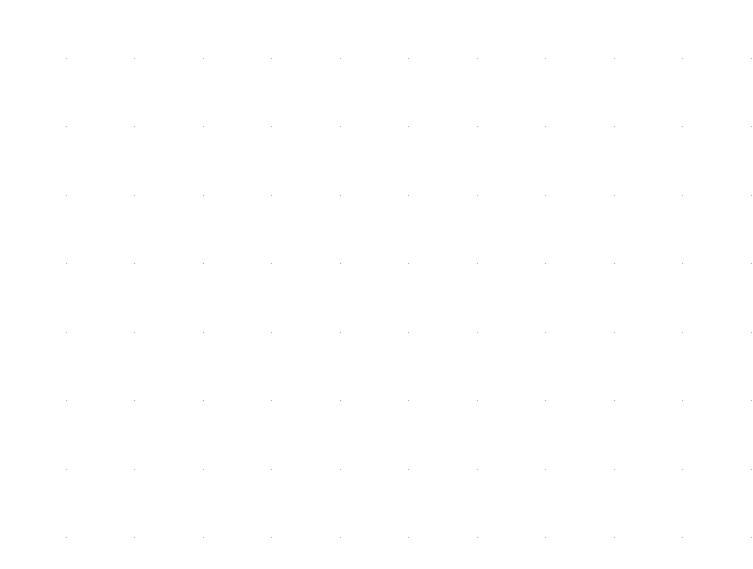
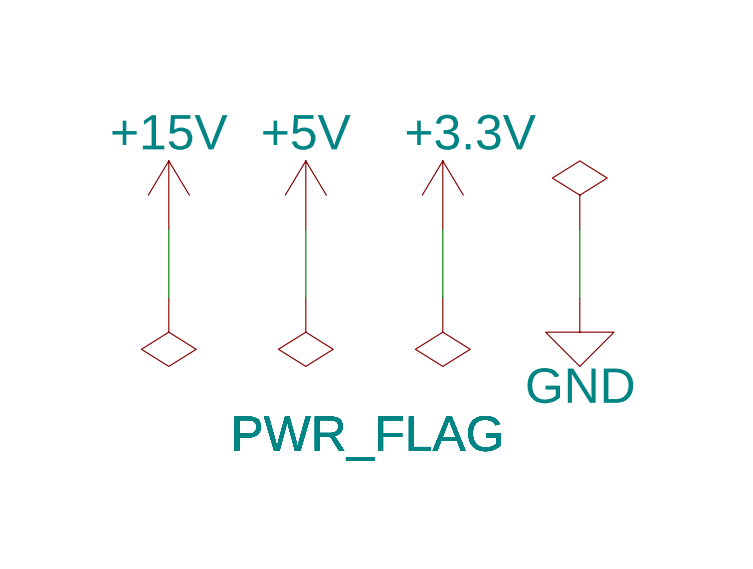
power symbol: none -> +15V (168, 195)
power symbol: none -> +5V (305, 195)
power symbol: none -> +3.3V (442, 195)
power symbol: none -> PWR_FLAG (579, 195)
wire: none -> (168, 229) (168, 297)
wire: none -> (305, 229) (305, 297)
wire: none -> (442, 229) (442, 297)
wire: none -> (579, 229) (579, 297)
power symbol: none -> PWR_FLAG (168, 332)
power symbol: none -> PWR_FLAG (305, 332)
power symbol: none -> PWR_FLAG (442, 332)
power symbol: none -> GND (579, 332)

